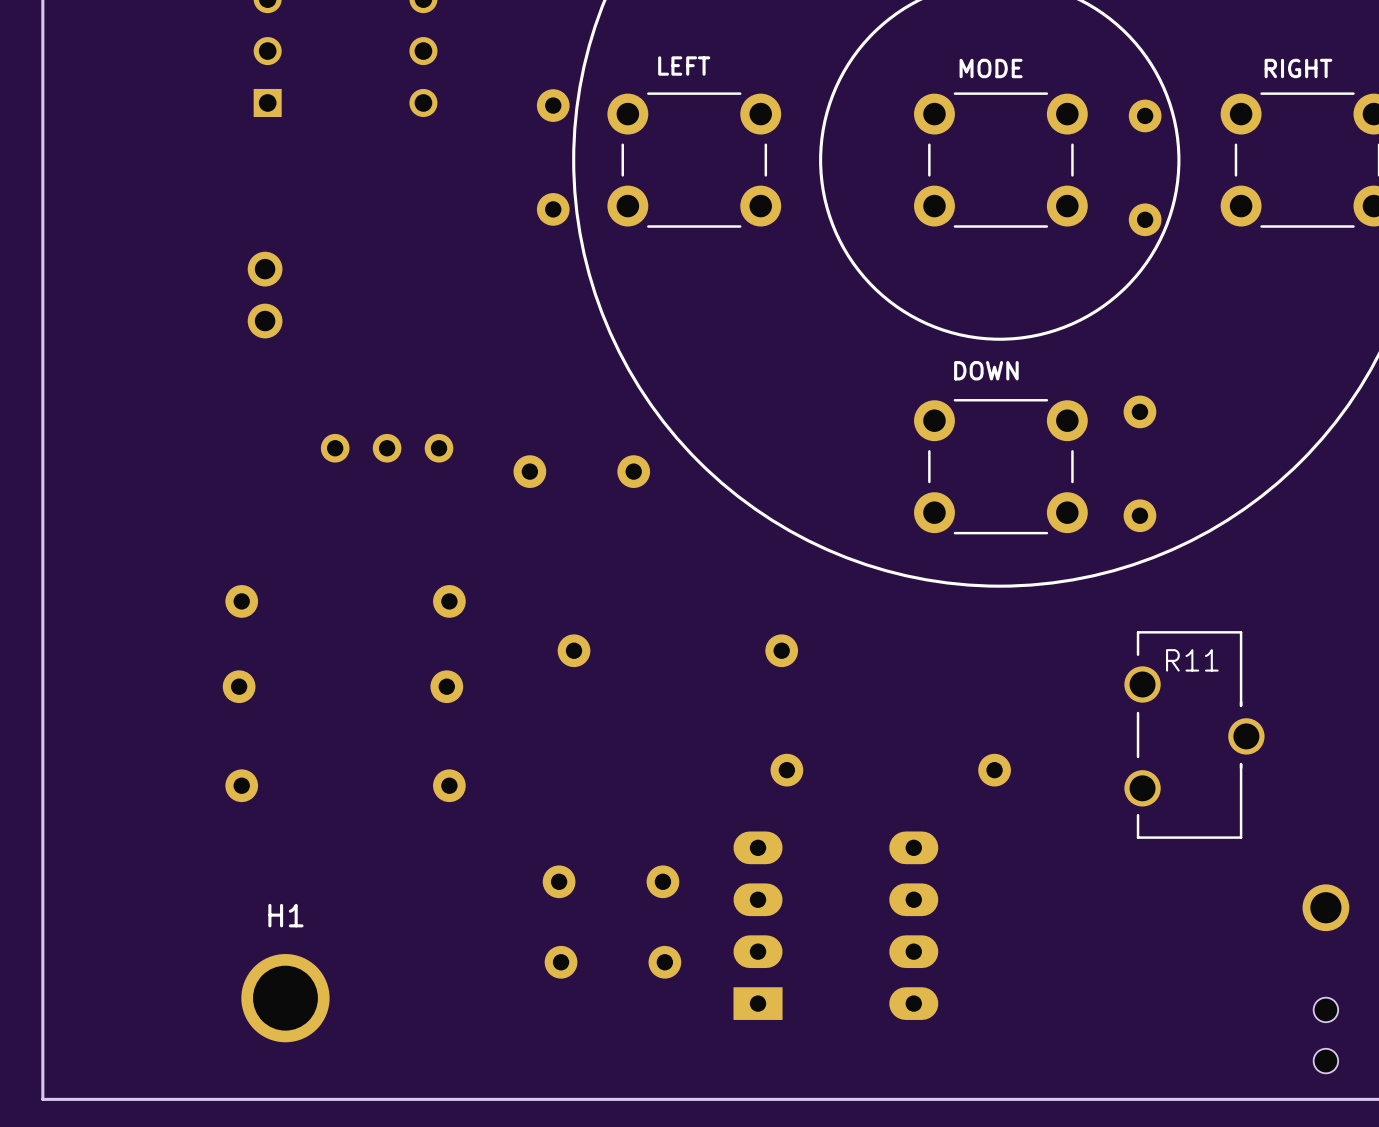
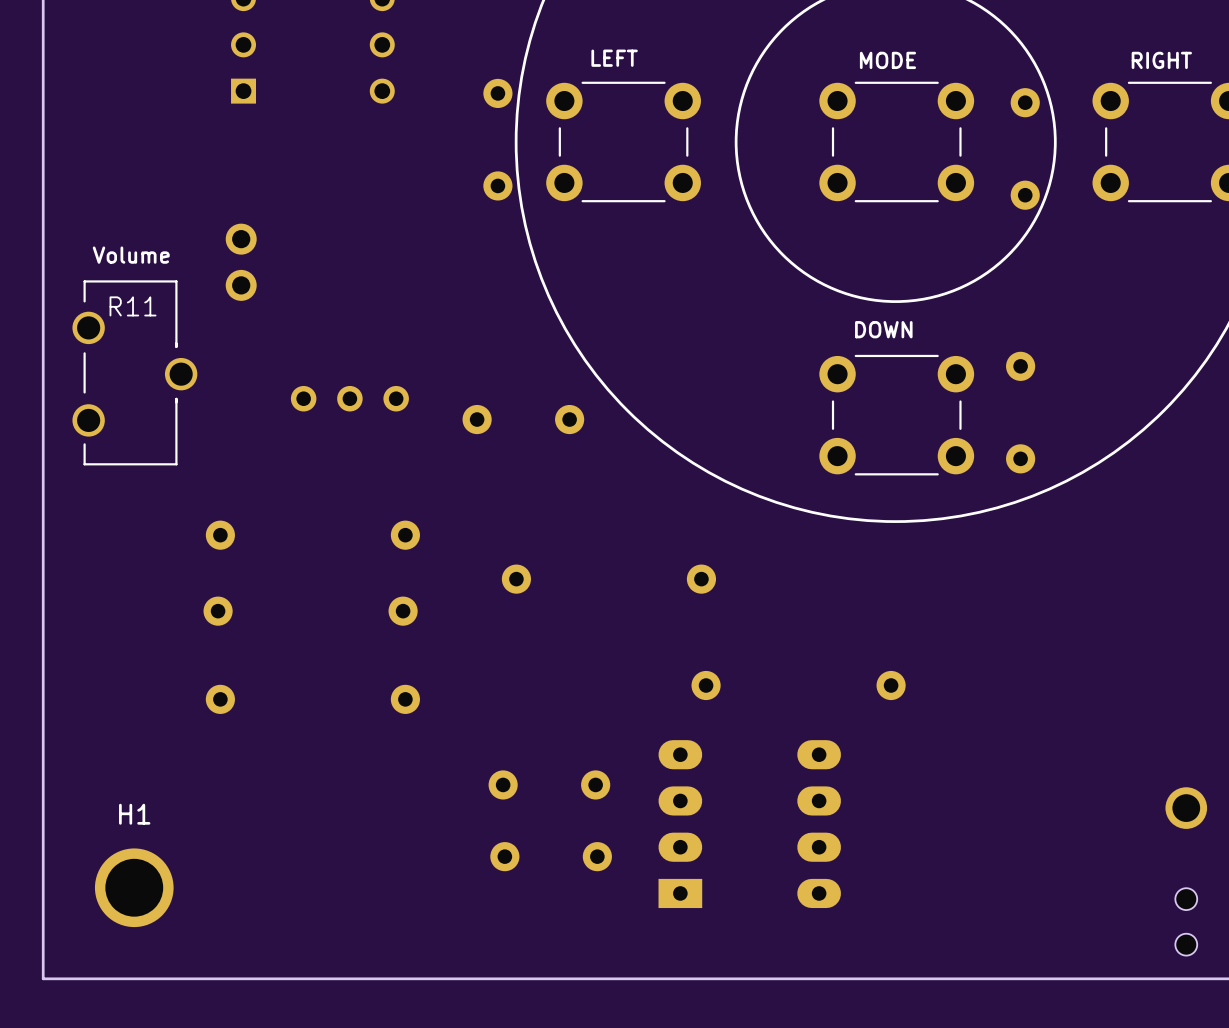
text: none -> Volume (131, 255)
R11 position: (1194, 734) -> (134, 372)
H1 position: (285, 998) -> (134, 887)

